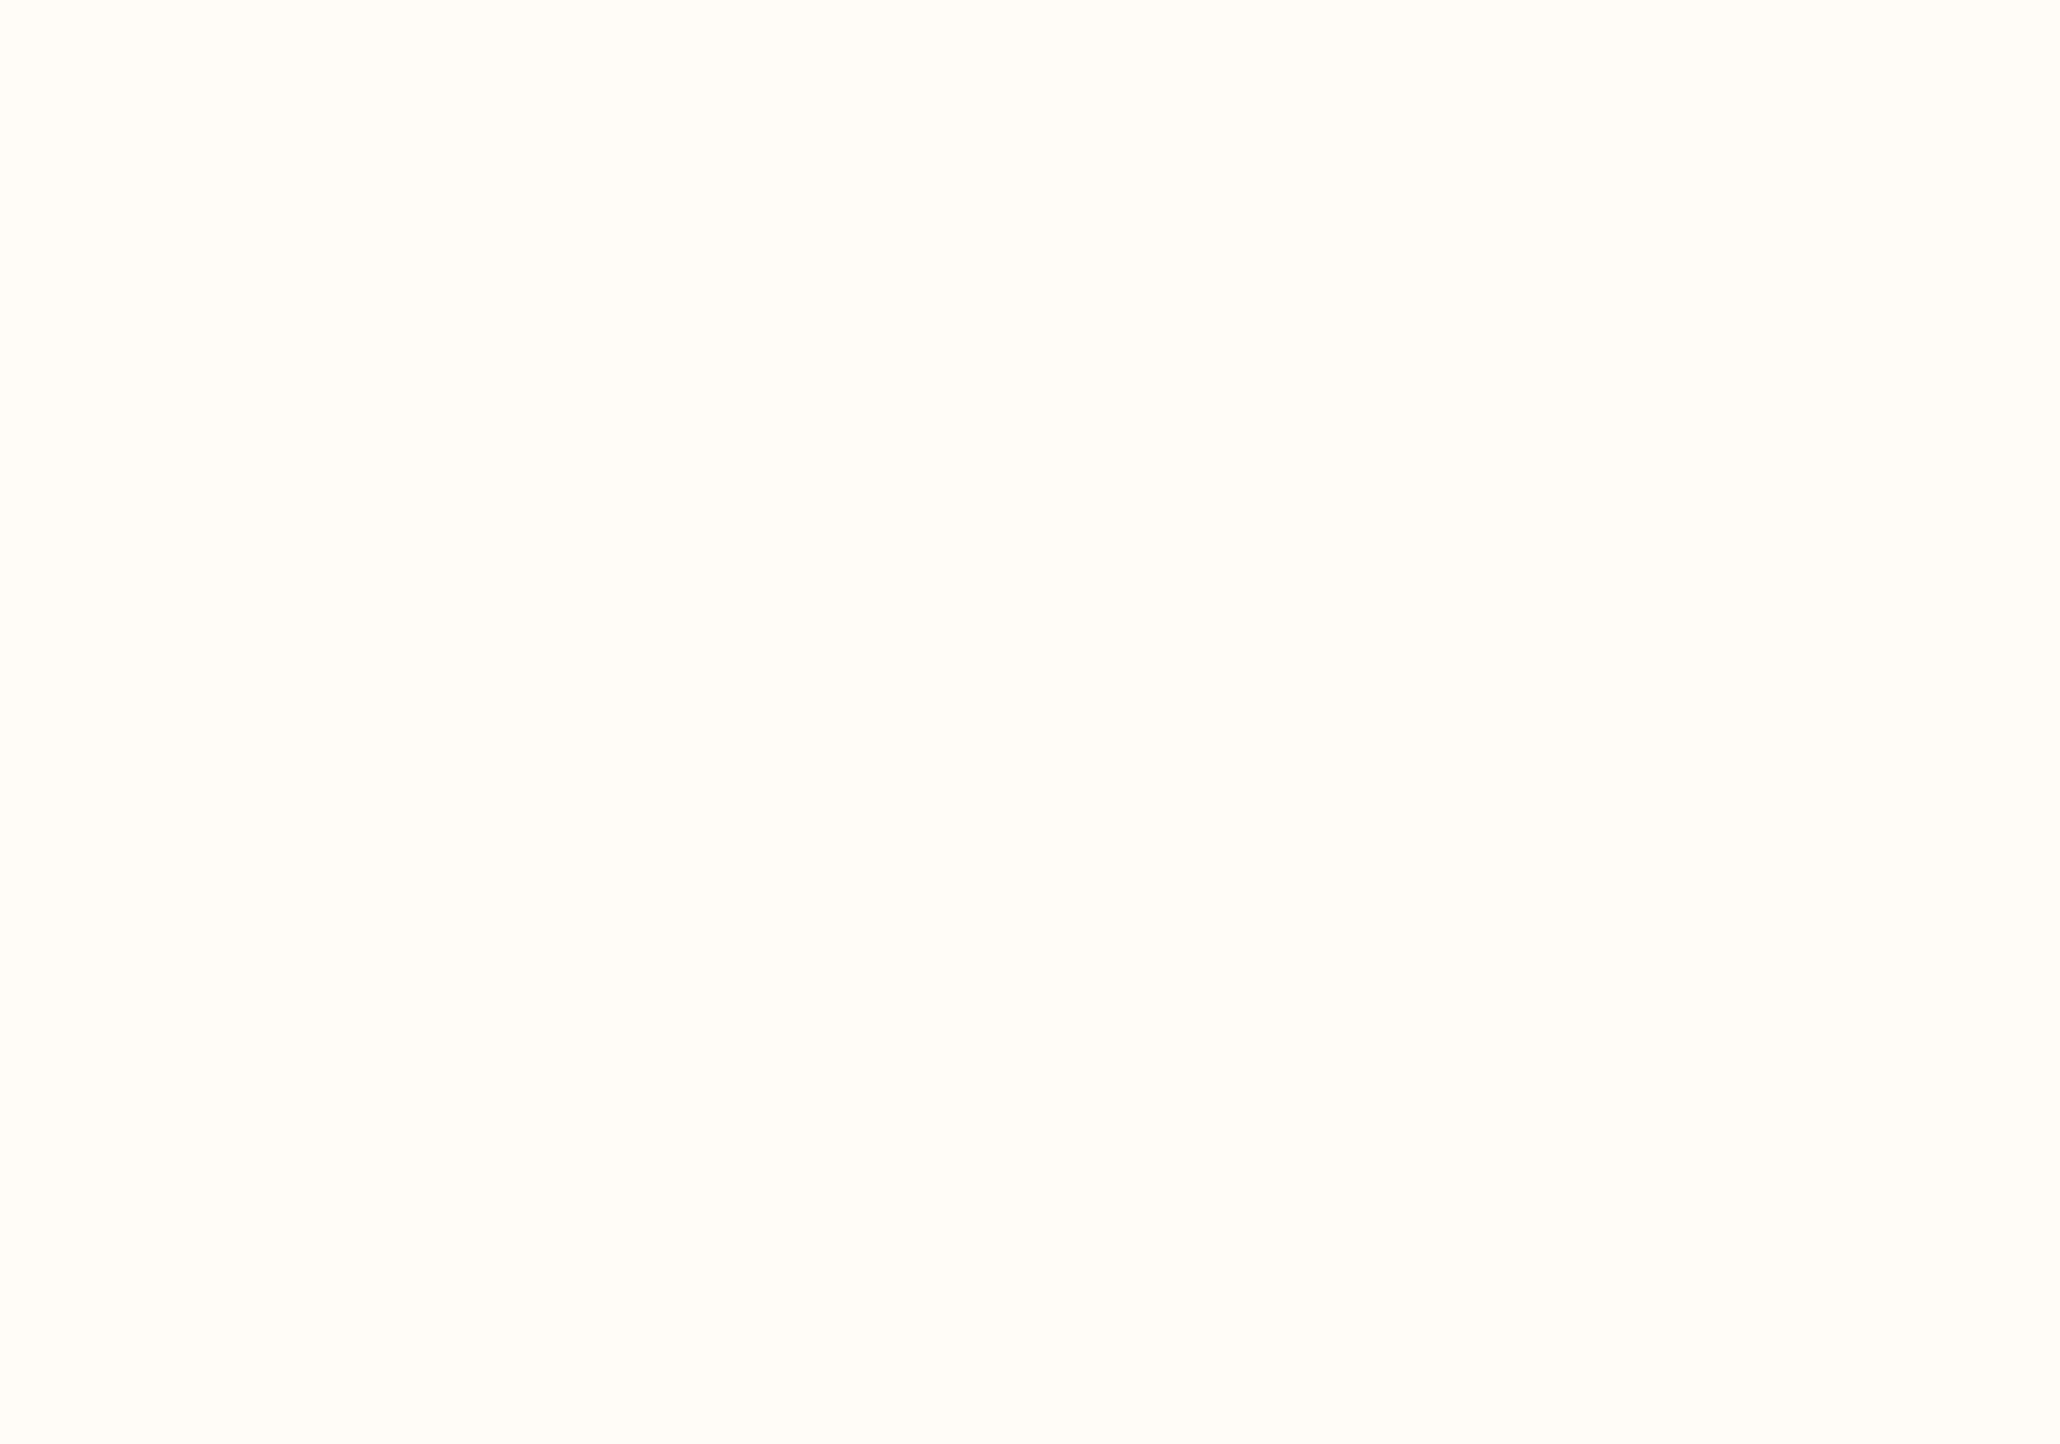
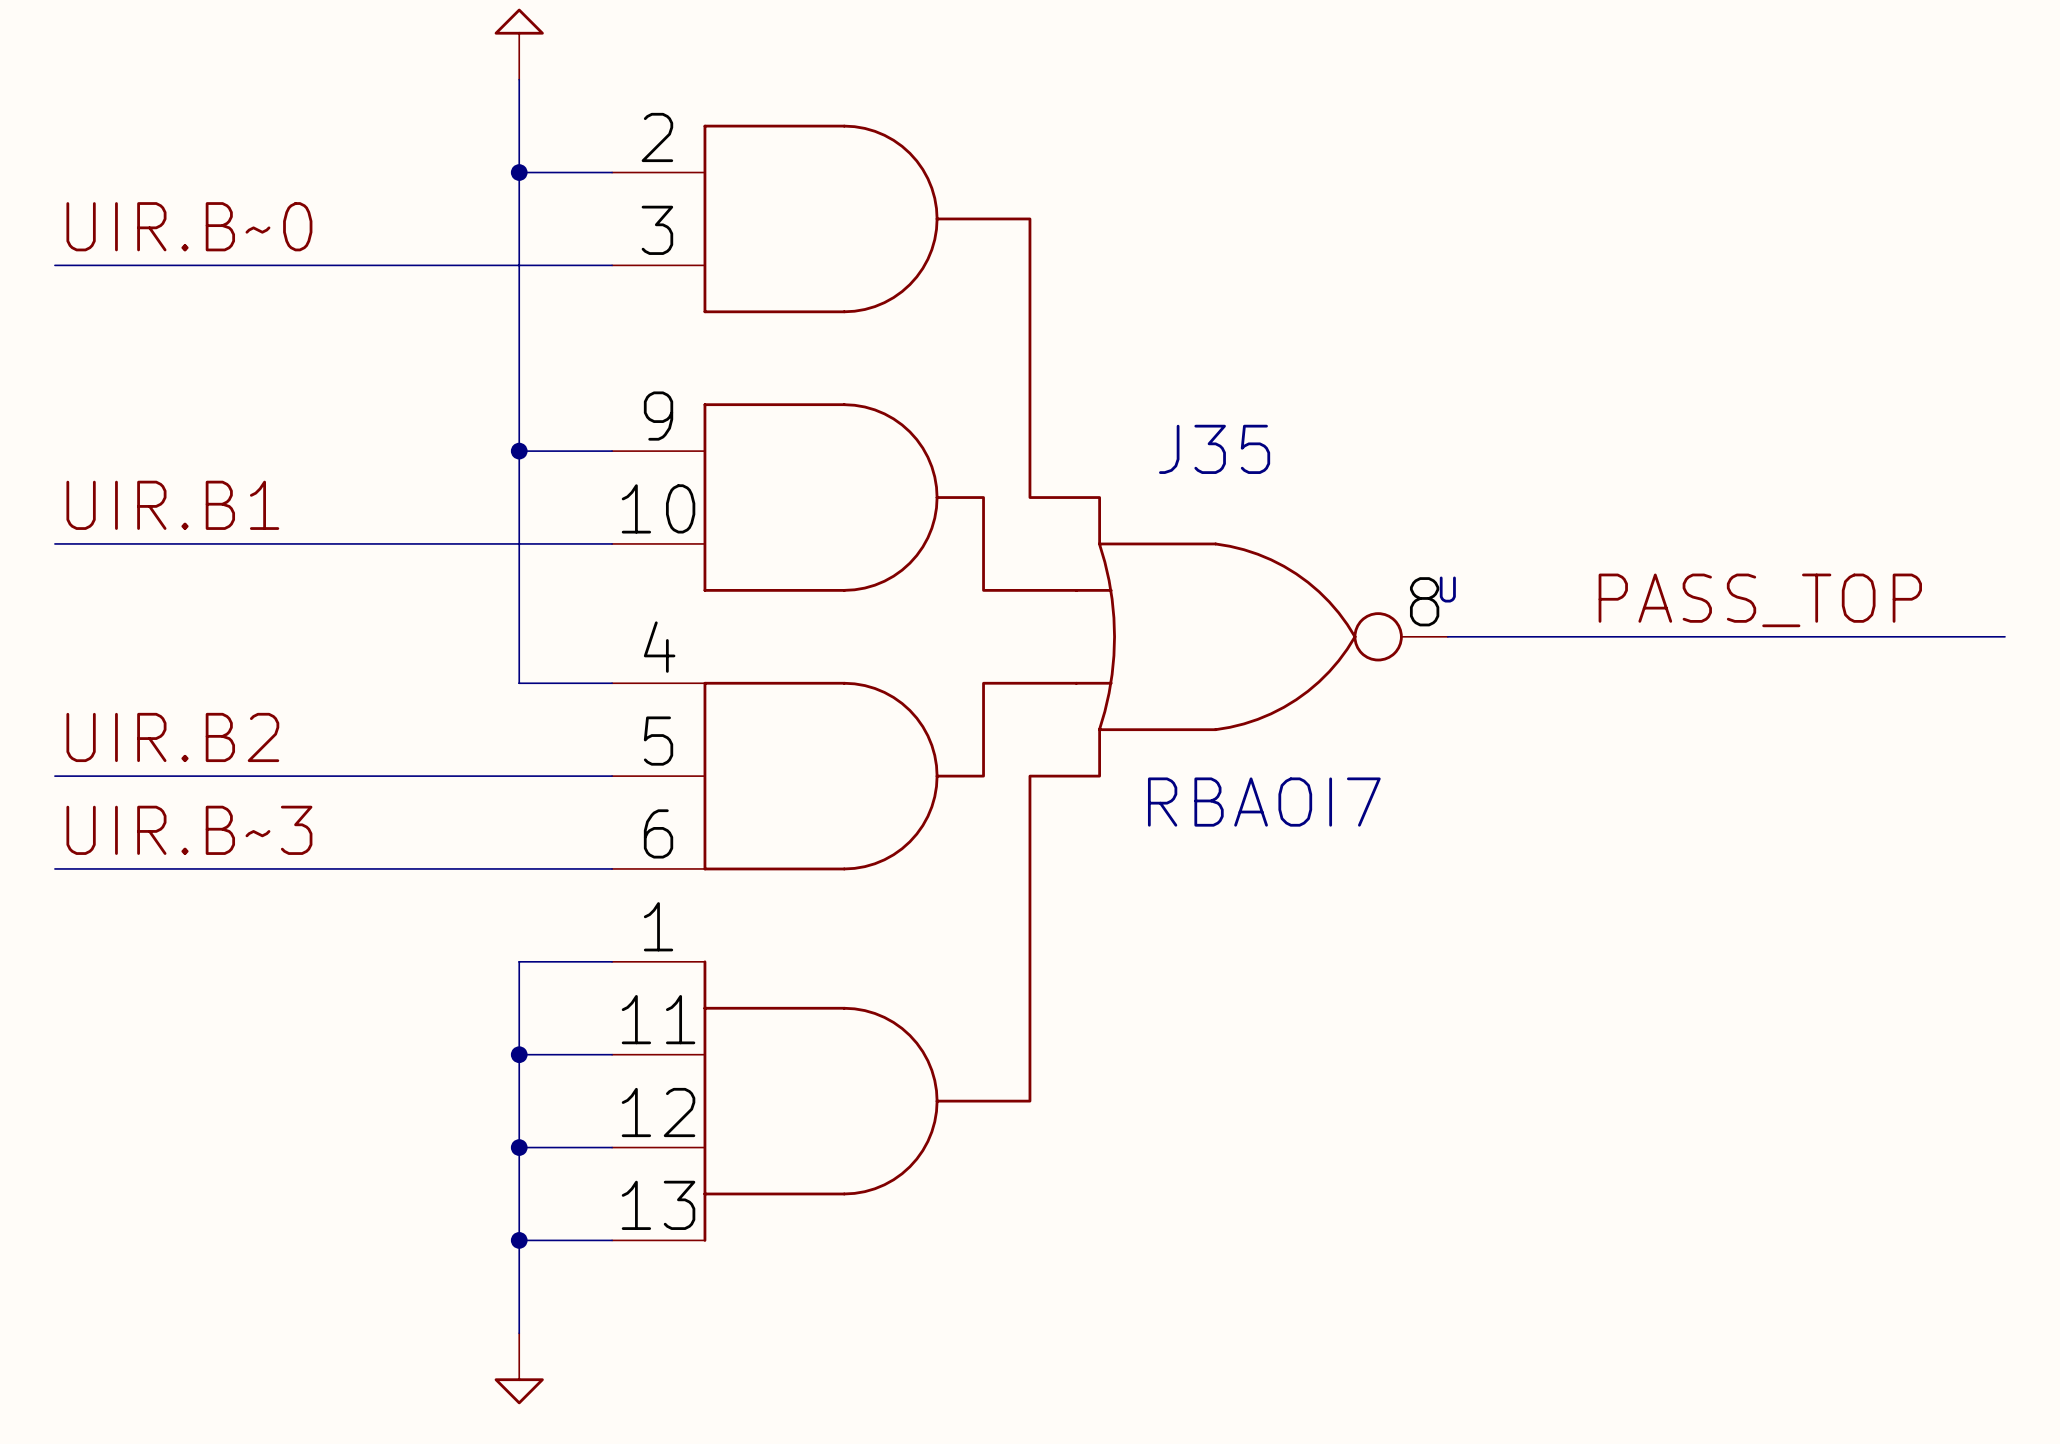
power symbol: none -> (519, 44)
wire: none -> (519, 79) (519, 683) (612, 683)
wire: none -> (519, 172) (612, 172)
junction: none -> (519, 172)
label: none -> UIR.B~0 (189, 226)
wire: none -> (54, 265) (612, 265)
wire: none -> (519, 451) (612, 451)
junction: none -> (519, 451)
label: none -> UIR.B1 (172, 505)
wire: none -> (54, 543) (612, 543)
label: none -> PASS_TOP (1760, 600)
wire: none -> (1447, 636) (2004, 636)
U: none -> (1029, 683)
label: none -> UIR.B2 (172, 737)
wire: none -> (54, 776) (612, 776)
label: none -> UIR.B~3 (189, 830)
wire: none -> (54, 868) (612, 868)
wire: none -> (612, 961) (519, 961) (519, 1333)
wire: none -> (519, 1054) (612, 1054)
junction: none -> (519, 1054)
wire: none -> (519, 1147) (612, 1147)
junction: none -> (519, 1147)
wire: none -> (519, 1240) (612, 1240)
junction: none -> (519, 1240)
power symbol: none -> (519, 1368)

